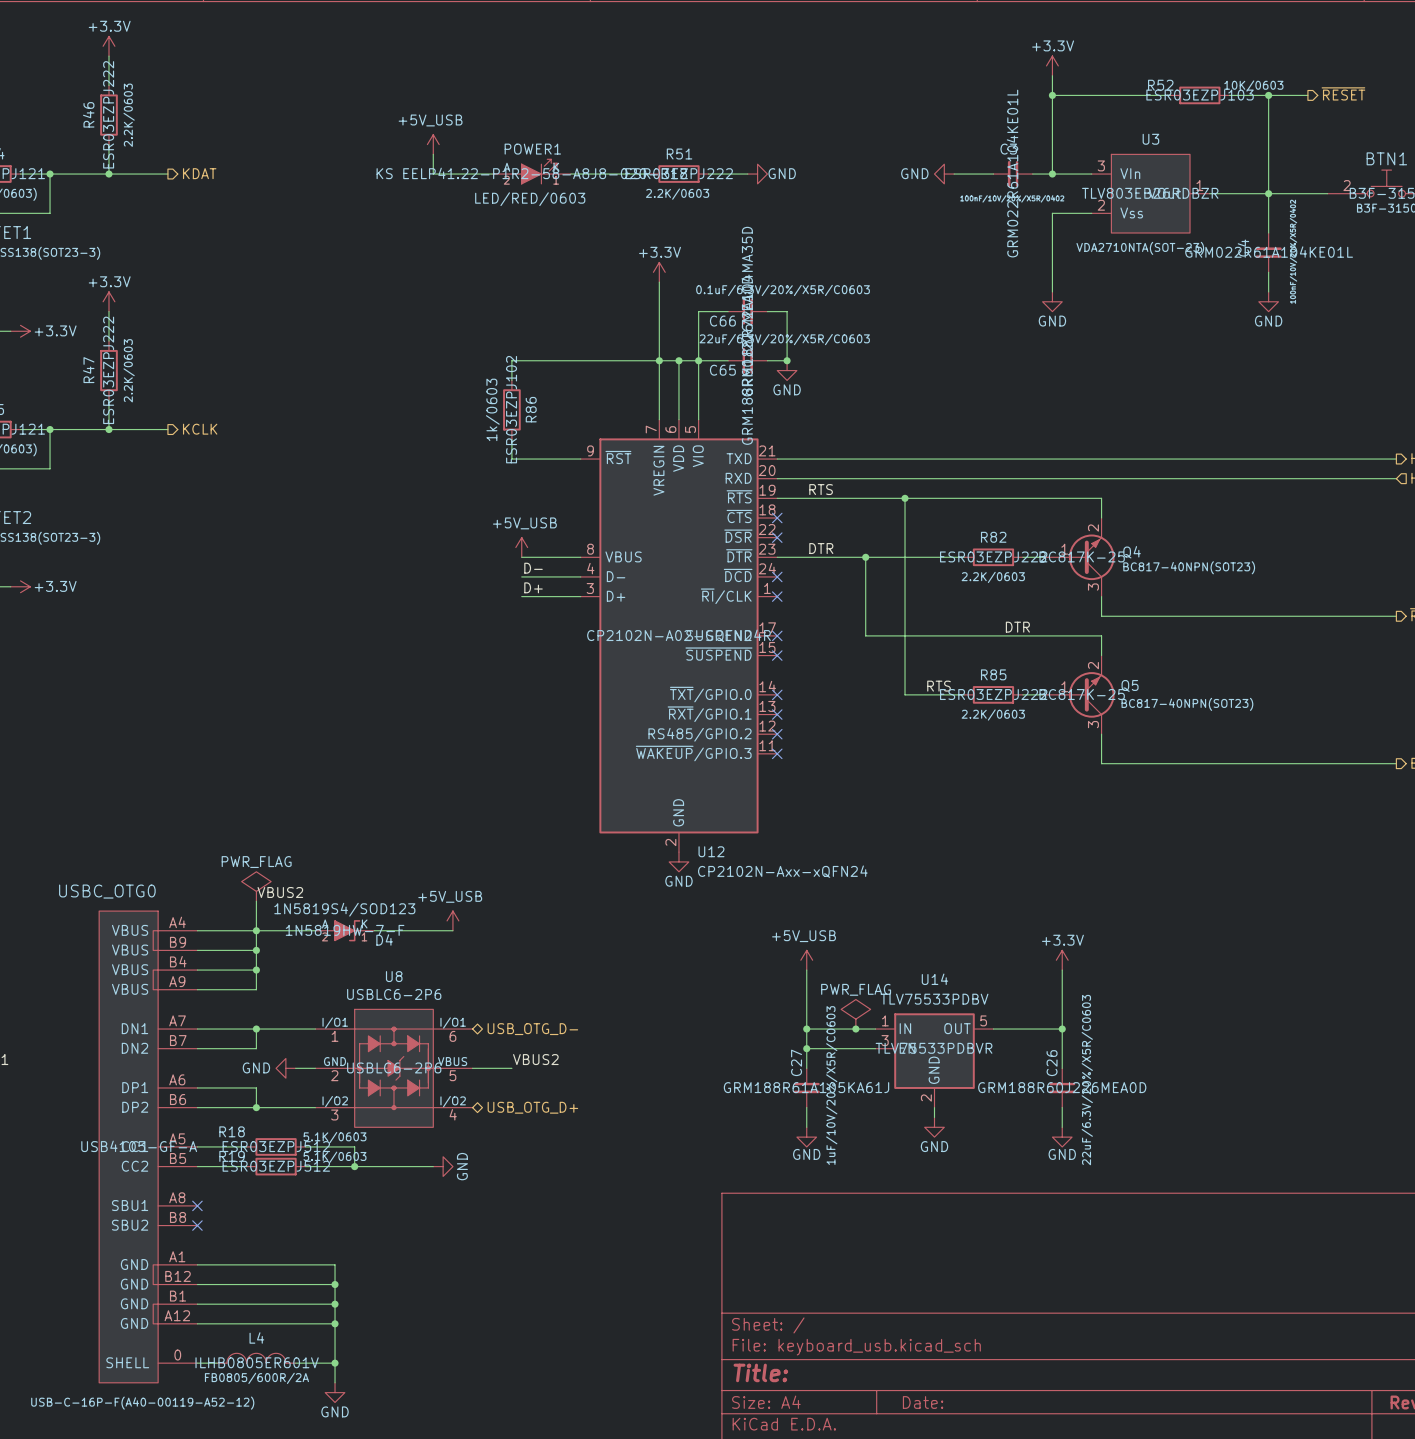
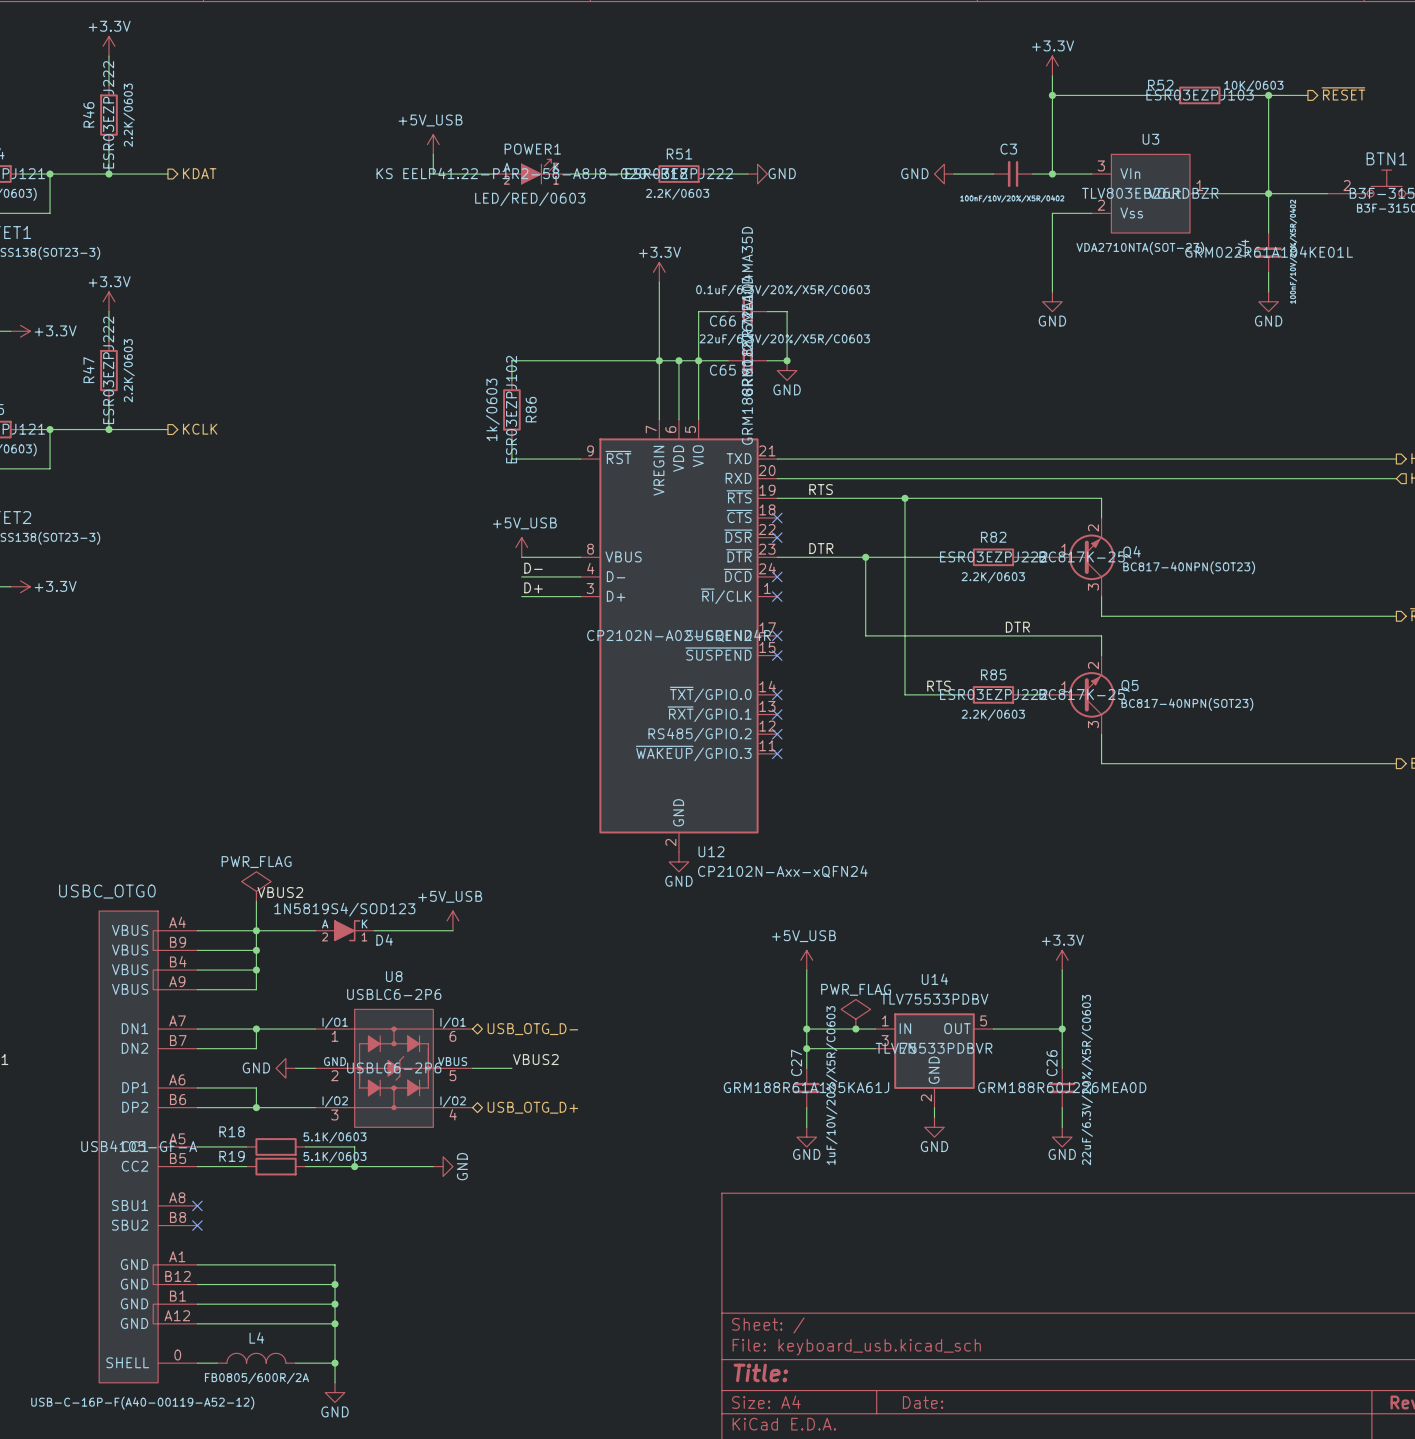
C3 text: GRM022R61A104KE01L (1012, 173) -> none
D4 text: 1N5819HW-7-F (345, 930) -> none
R18 text: ESR03EZPJ512 (276, 1146) -> none
R19 text: ESR03EZPJ512 (276, 1166) -> none
L4 text: ILHB0805ER601V (257, 1362) -> none

